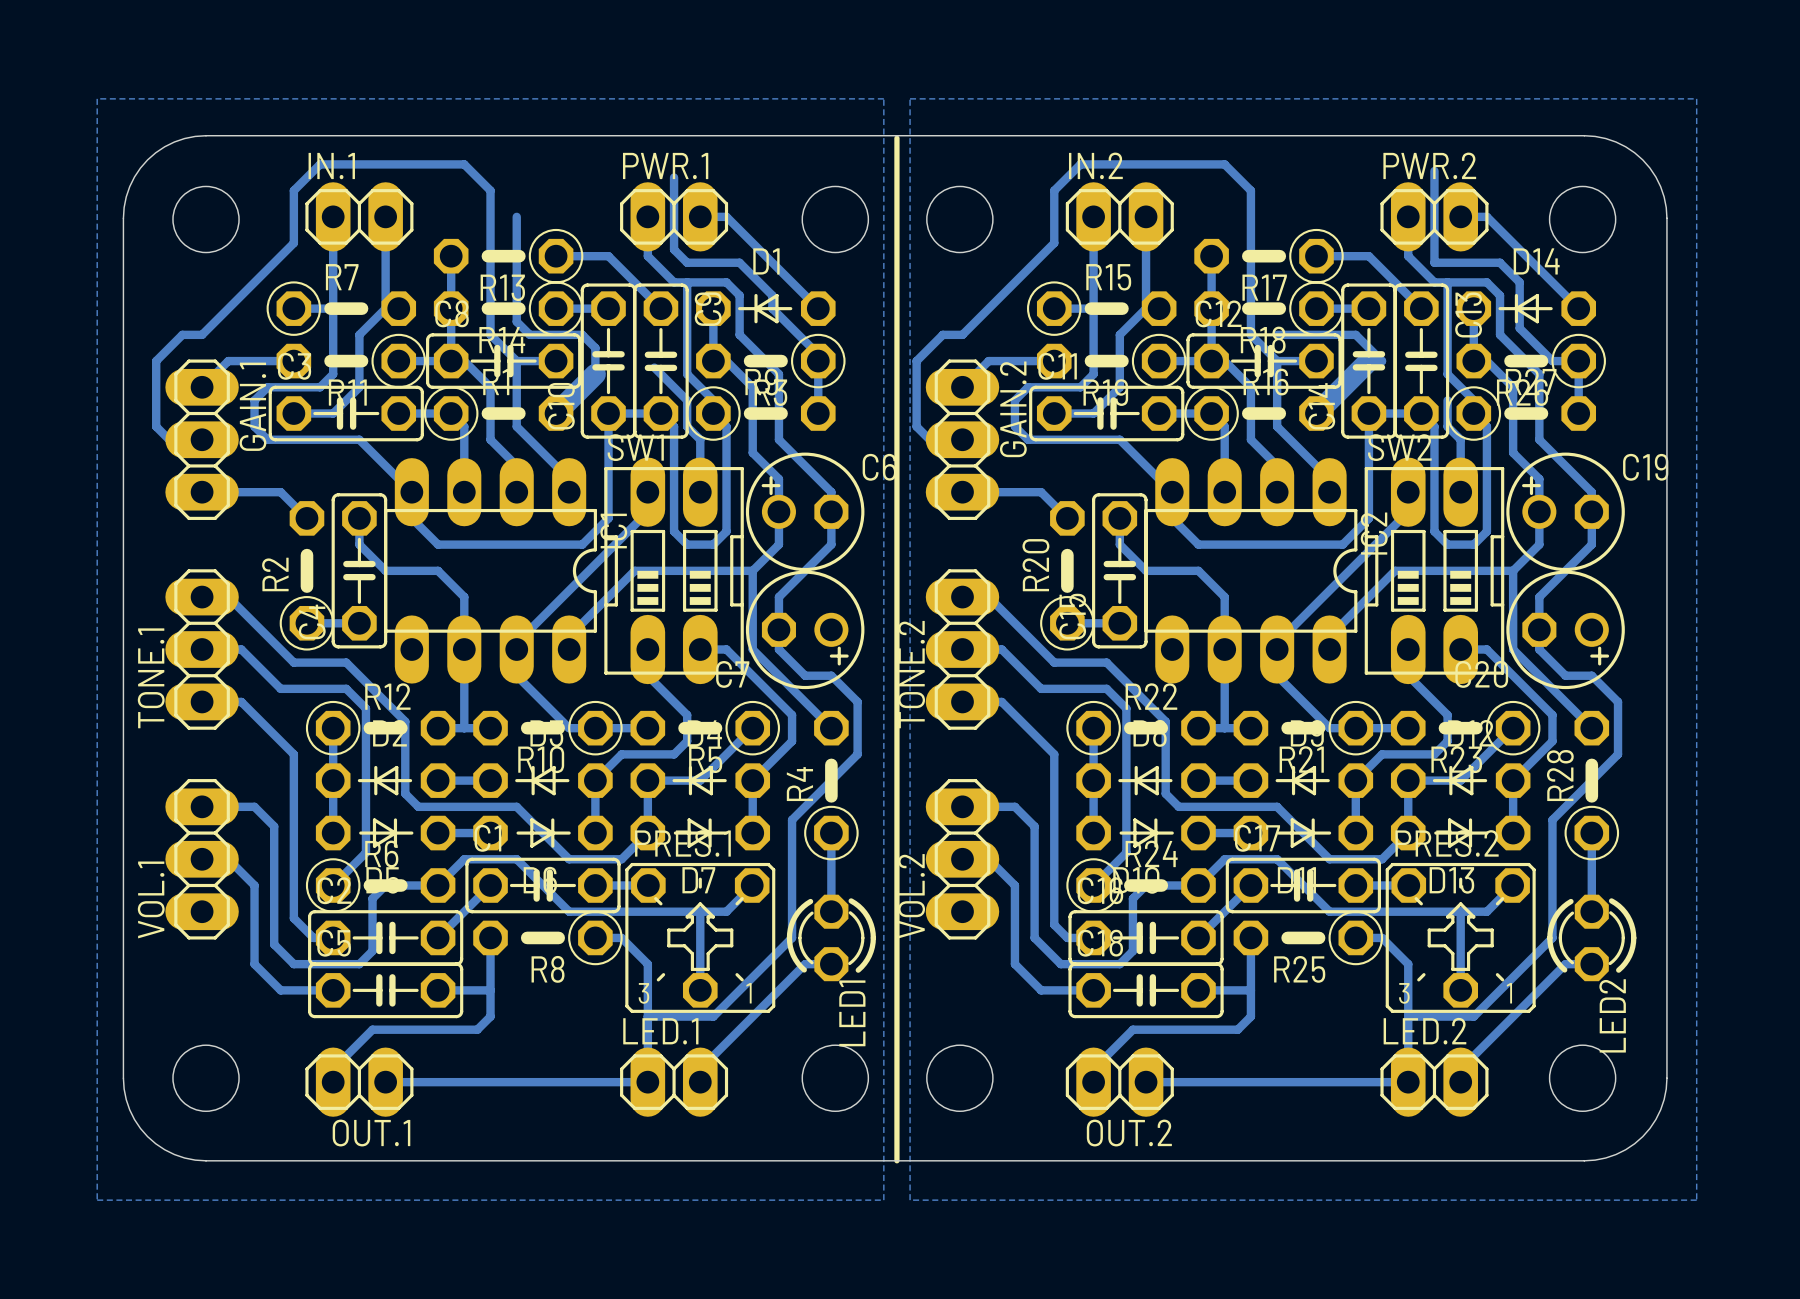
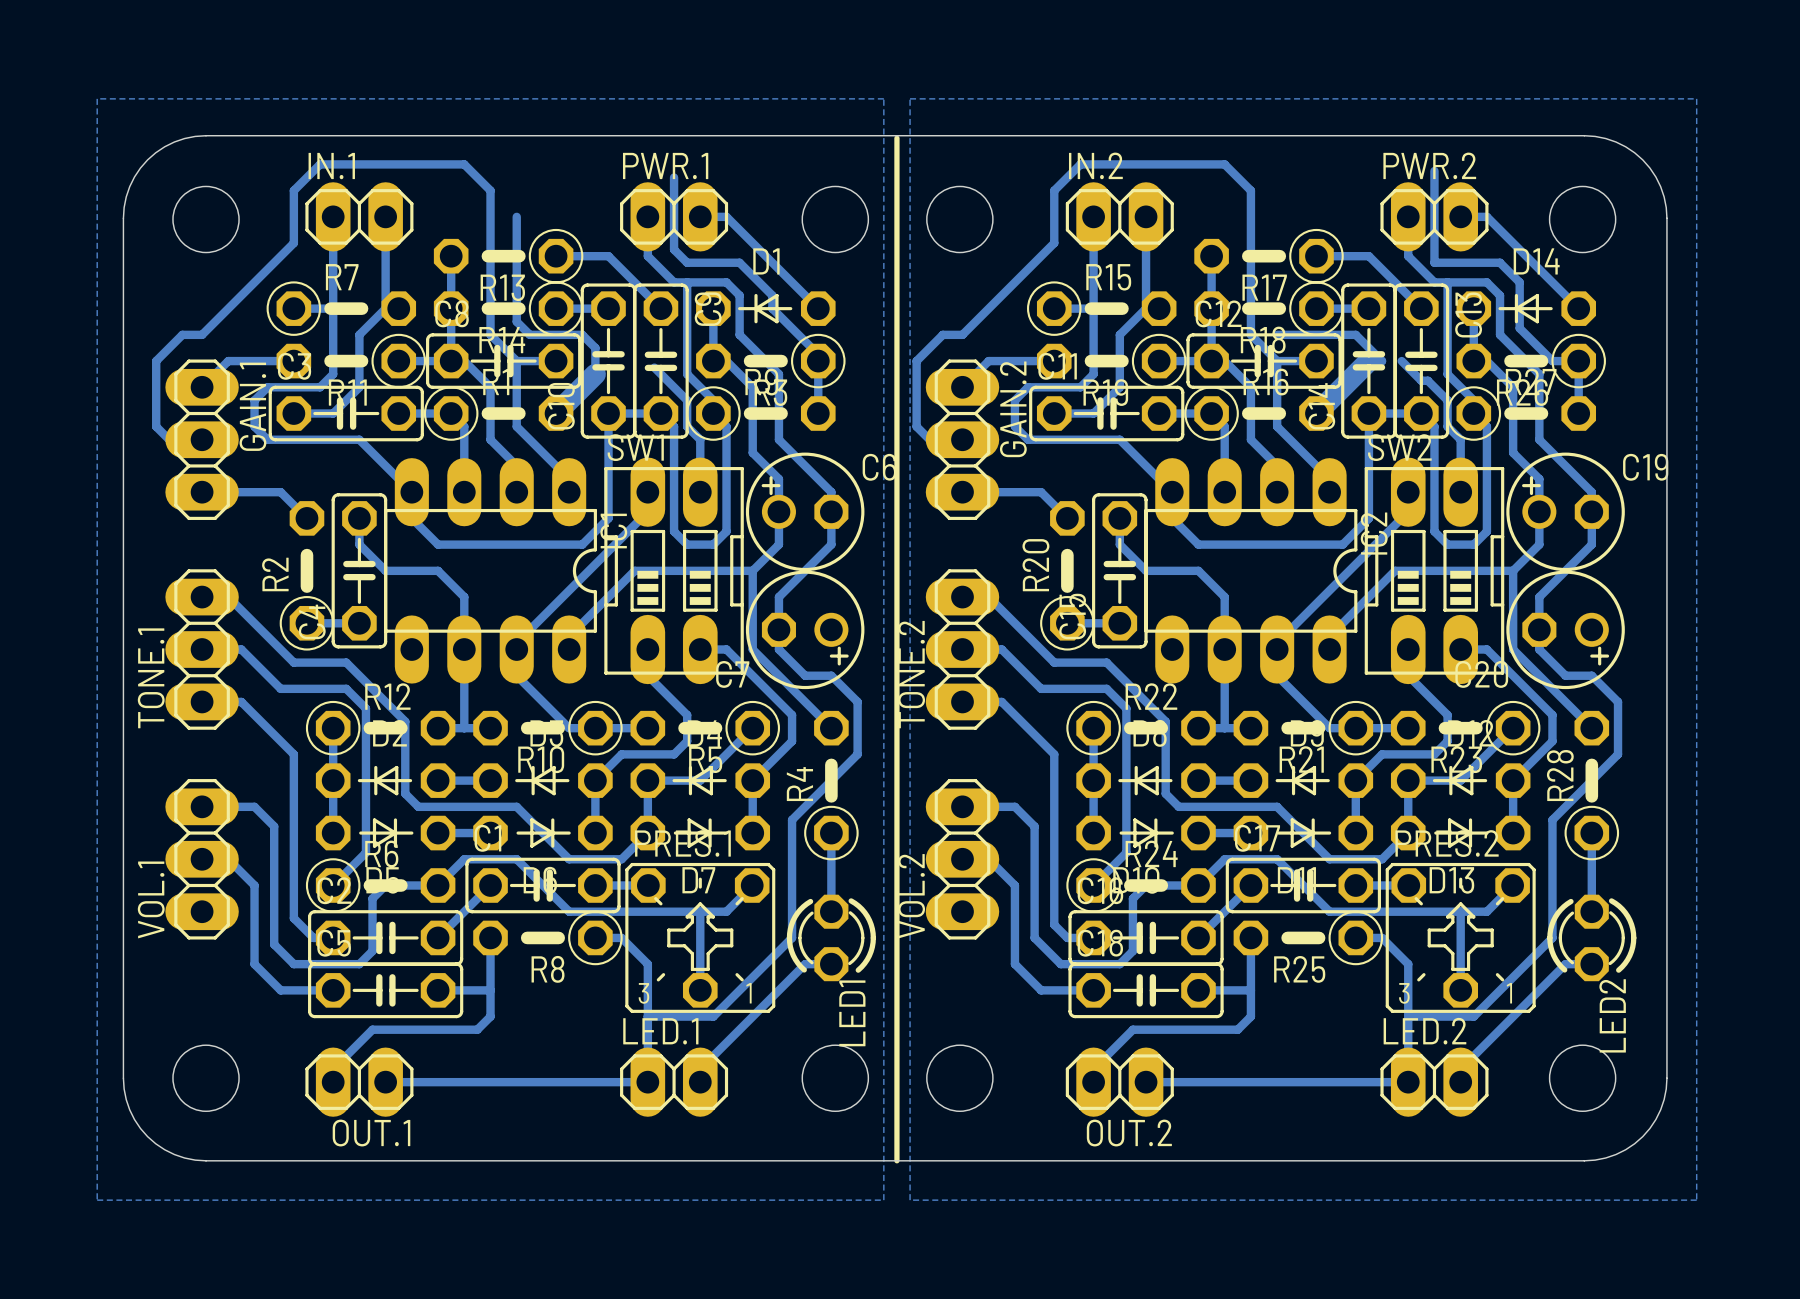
bottom track: none -> (1401, 361) (1421, 380) (1427, 380) (1447, 400)

